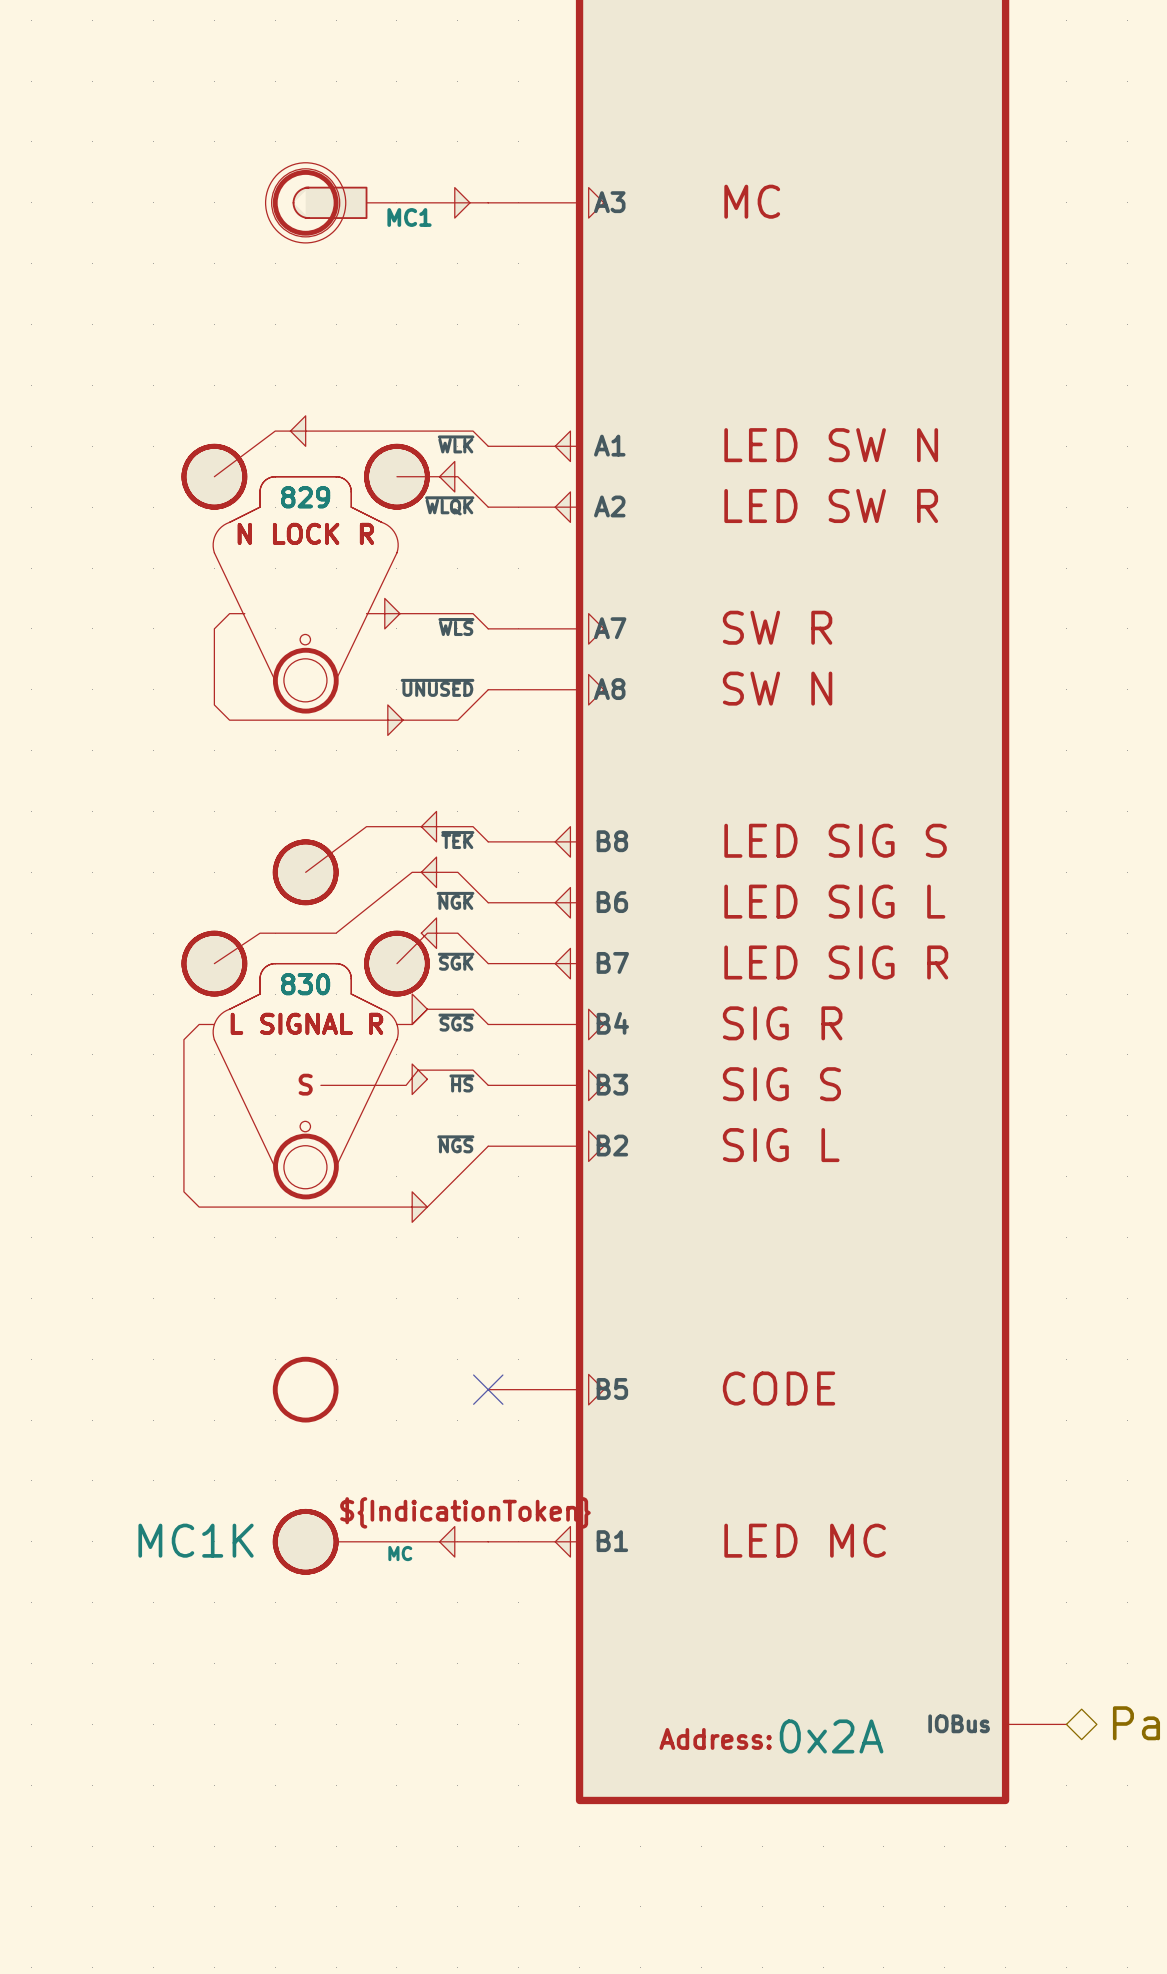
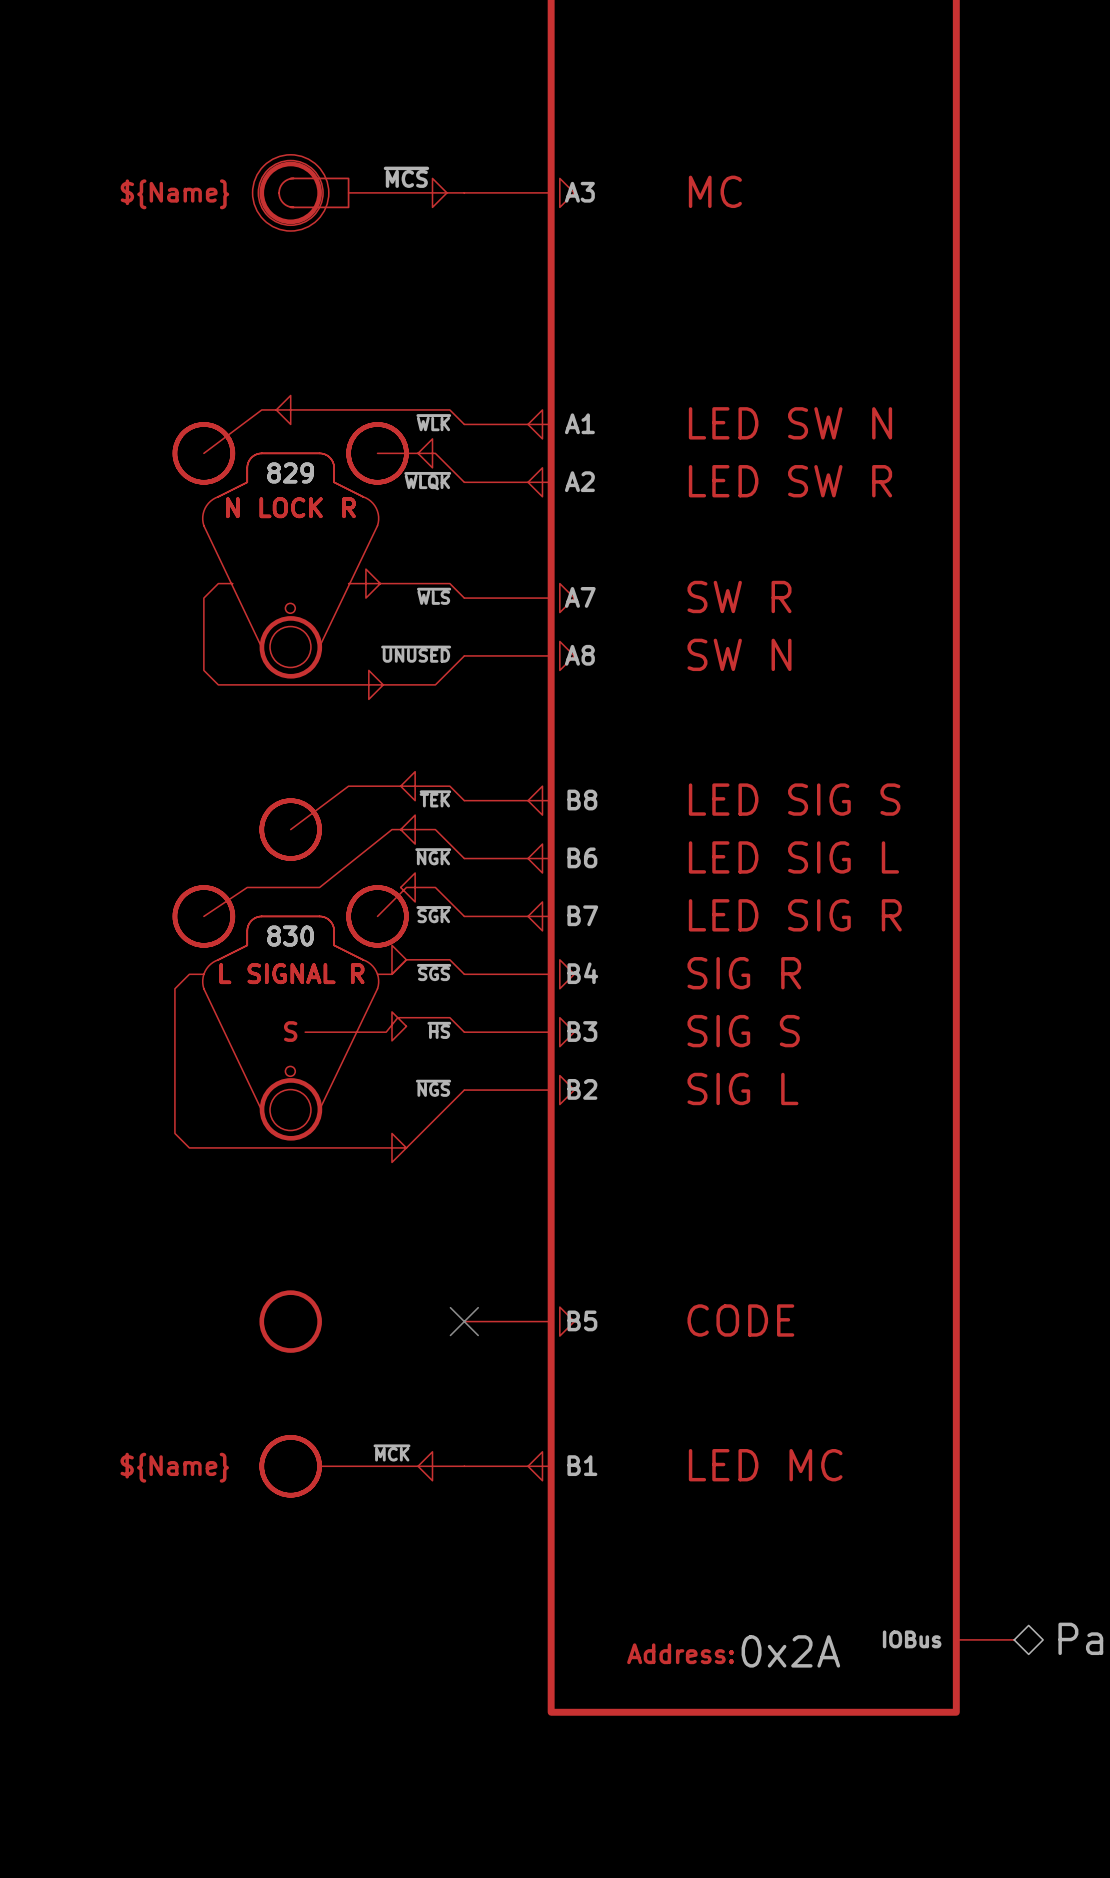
part pin name: none -> ~{MCS} (406, 177)
part text: none -> ${Name} (174, 194)
part value: MC1 (409, 217) -> none
part text: ${IndicationToken} (465, 1512) -> none
part pin name: none -> ~{MCK} (391, 1452)
part text: MC1K (196, 1540) -> none
part text: none -> ${Name} (174, 1467)
part value: MC (400, 1553) -> none

